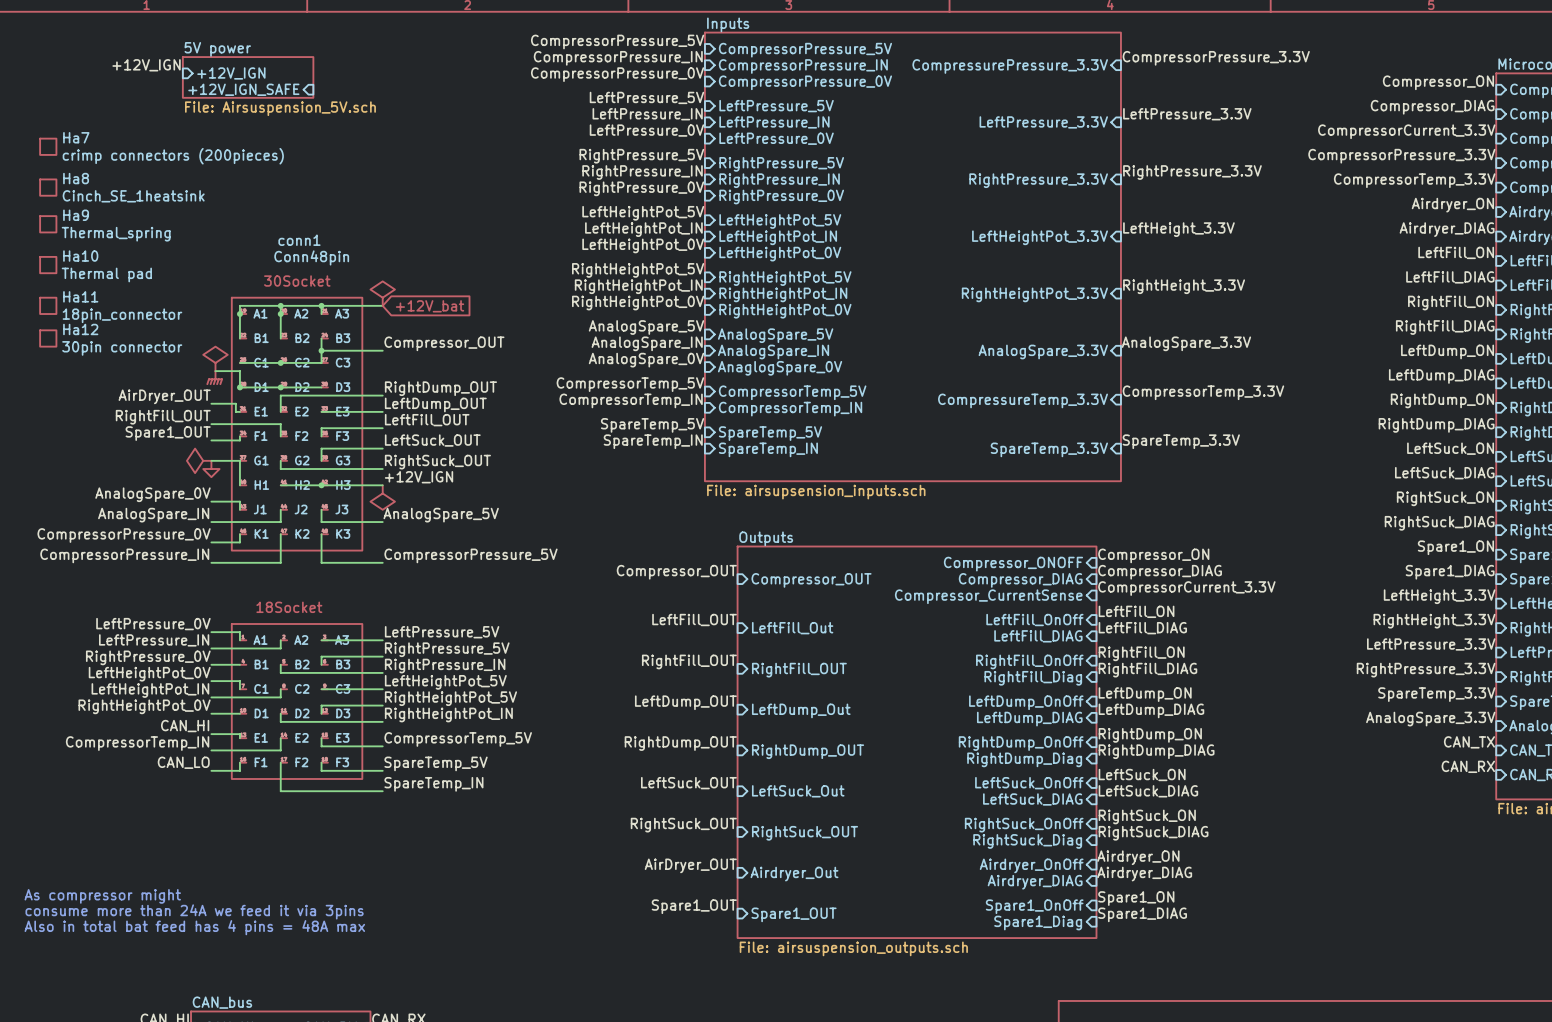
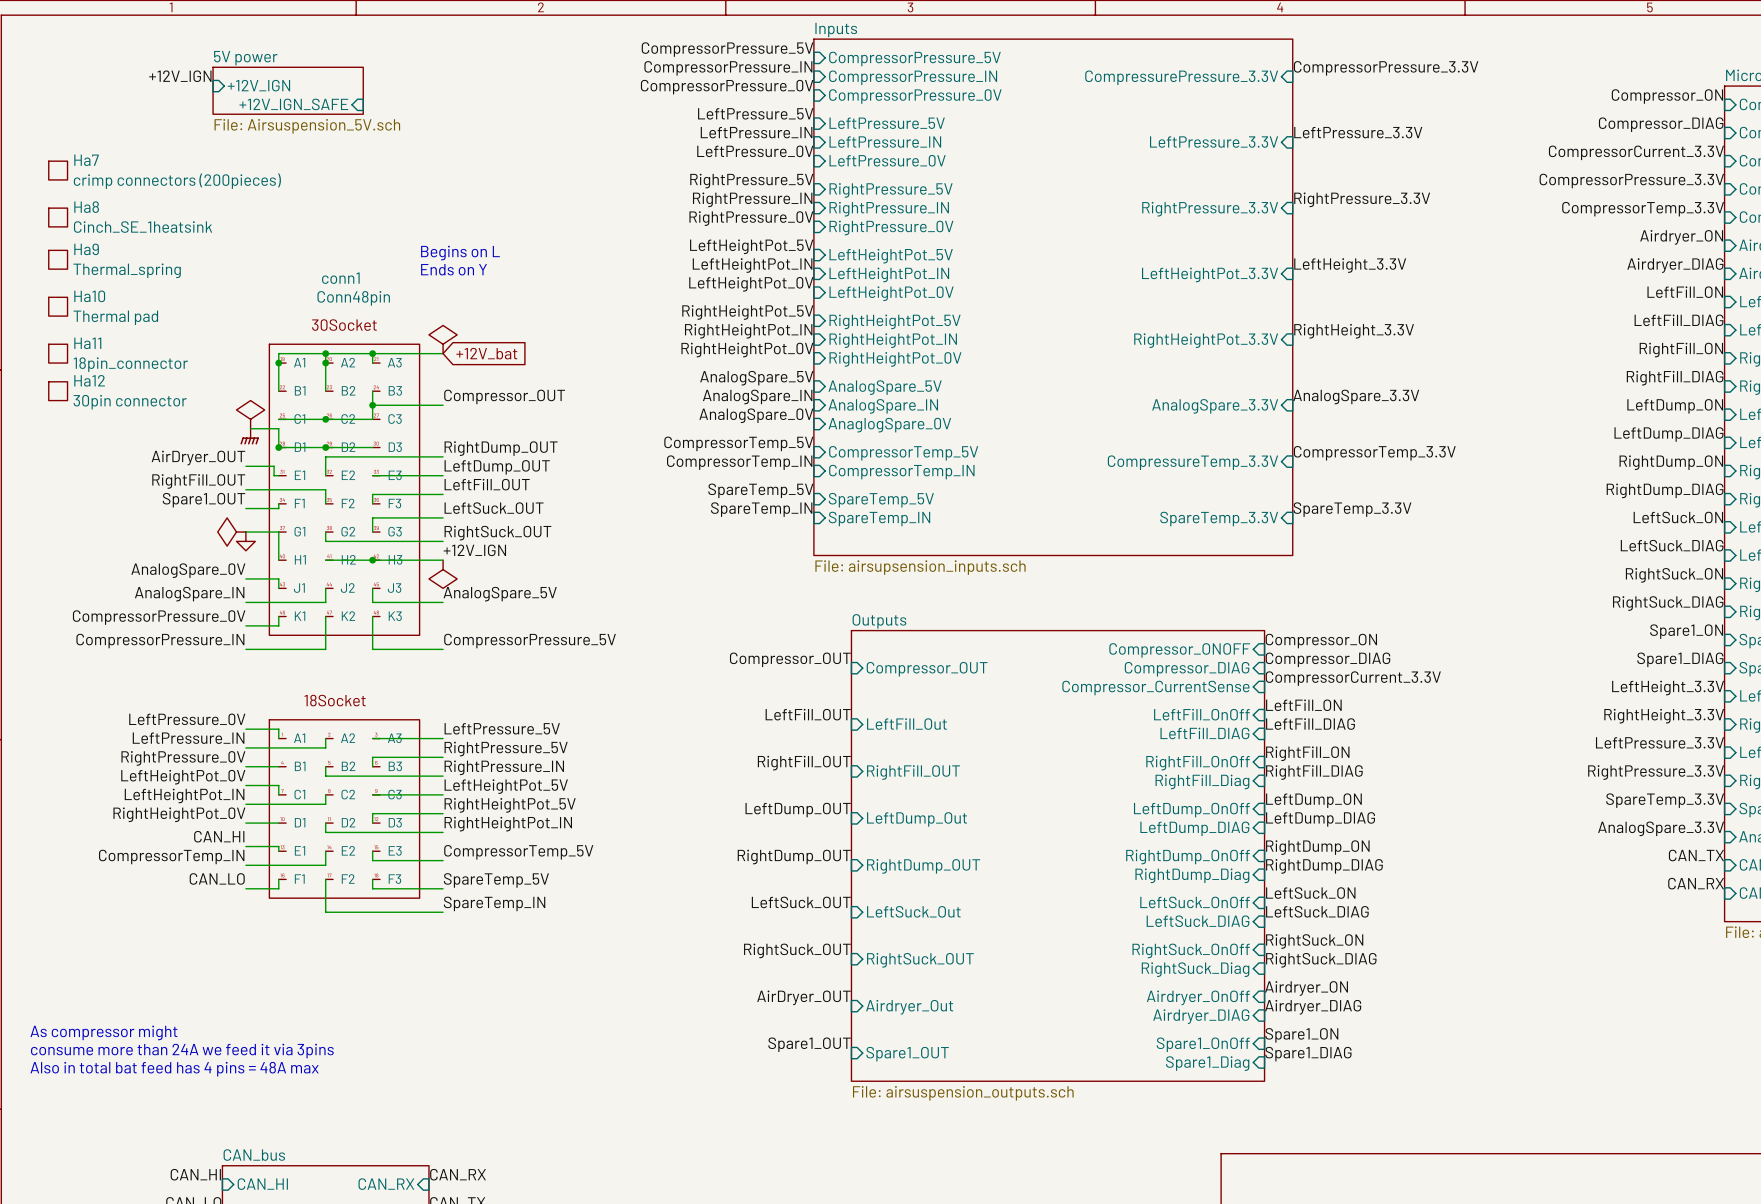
text: none -> Begins on L (460, 253)
text: none -> Ends on Y (454, 269)

